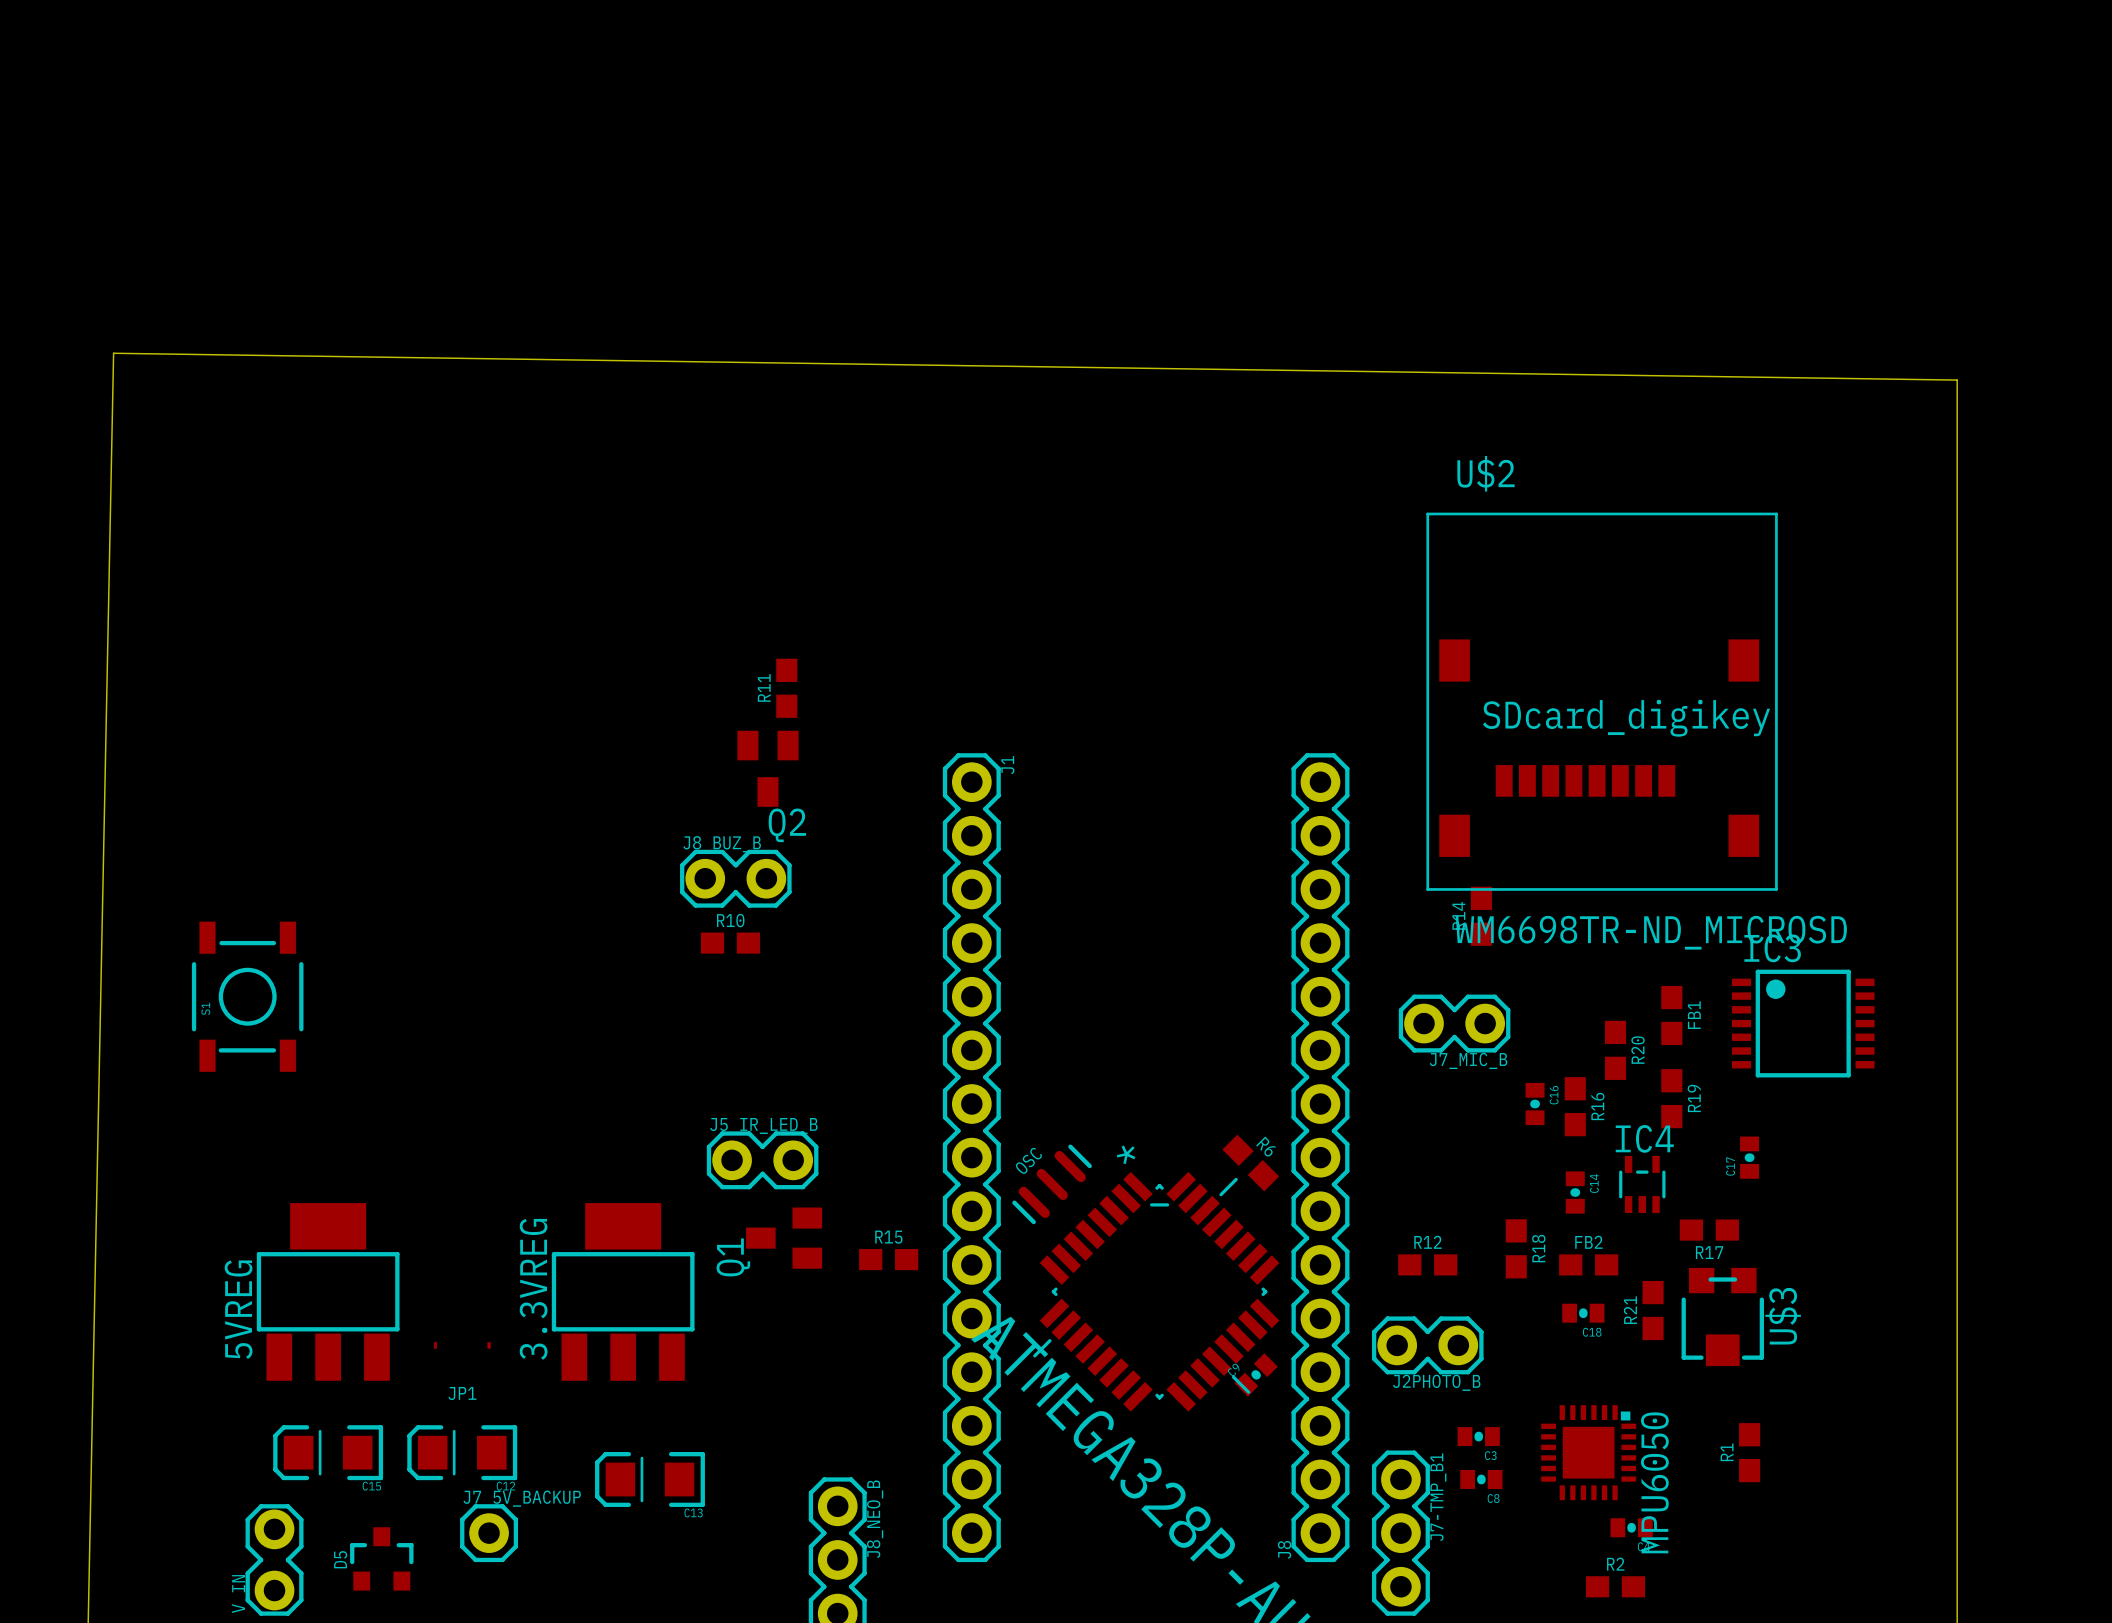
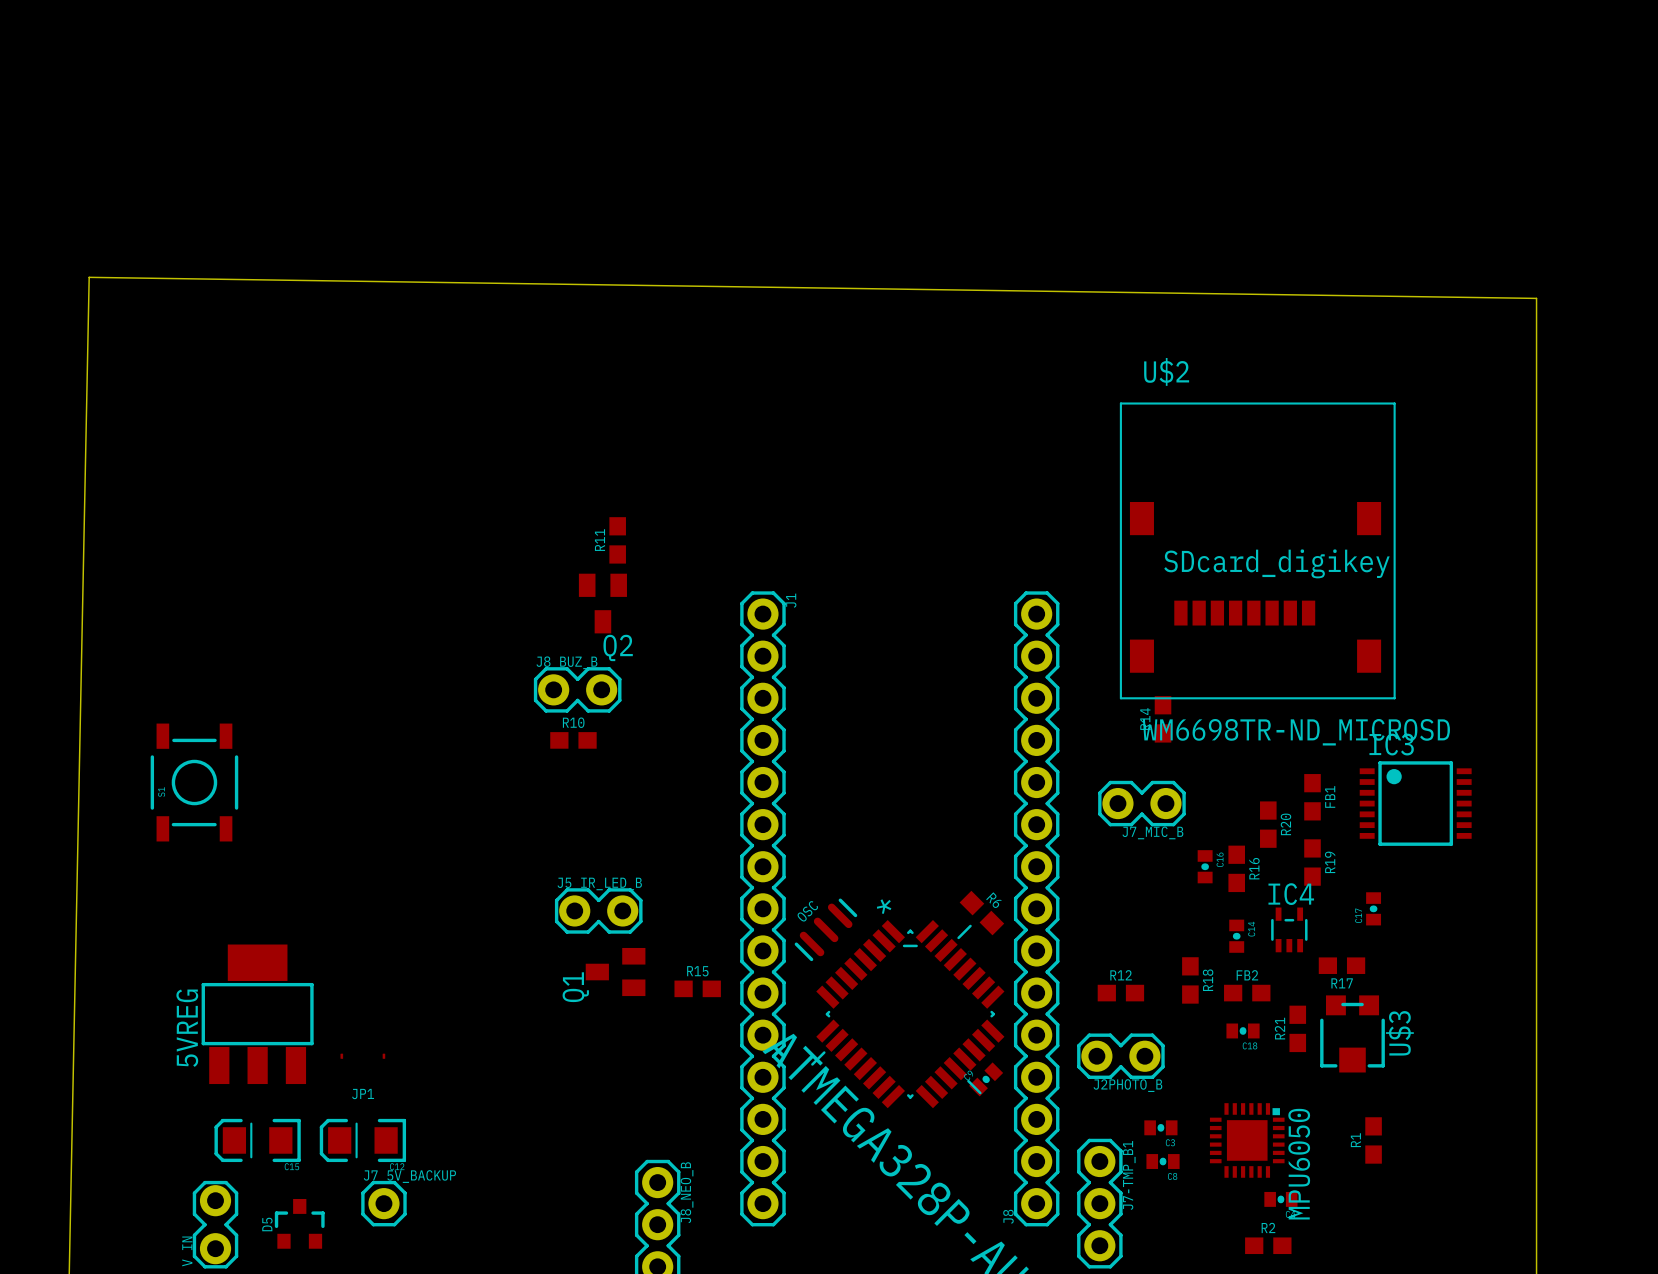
3.3VREG: (623, 1291) -> none
C13: (649, 1479) -> none

